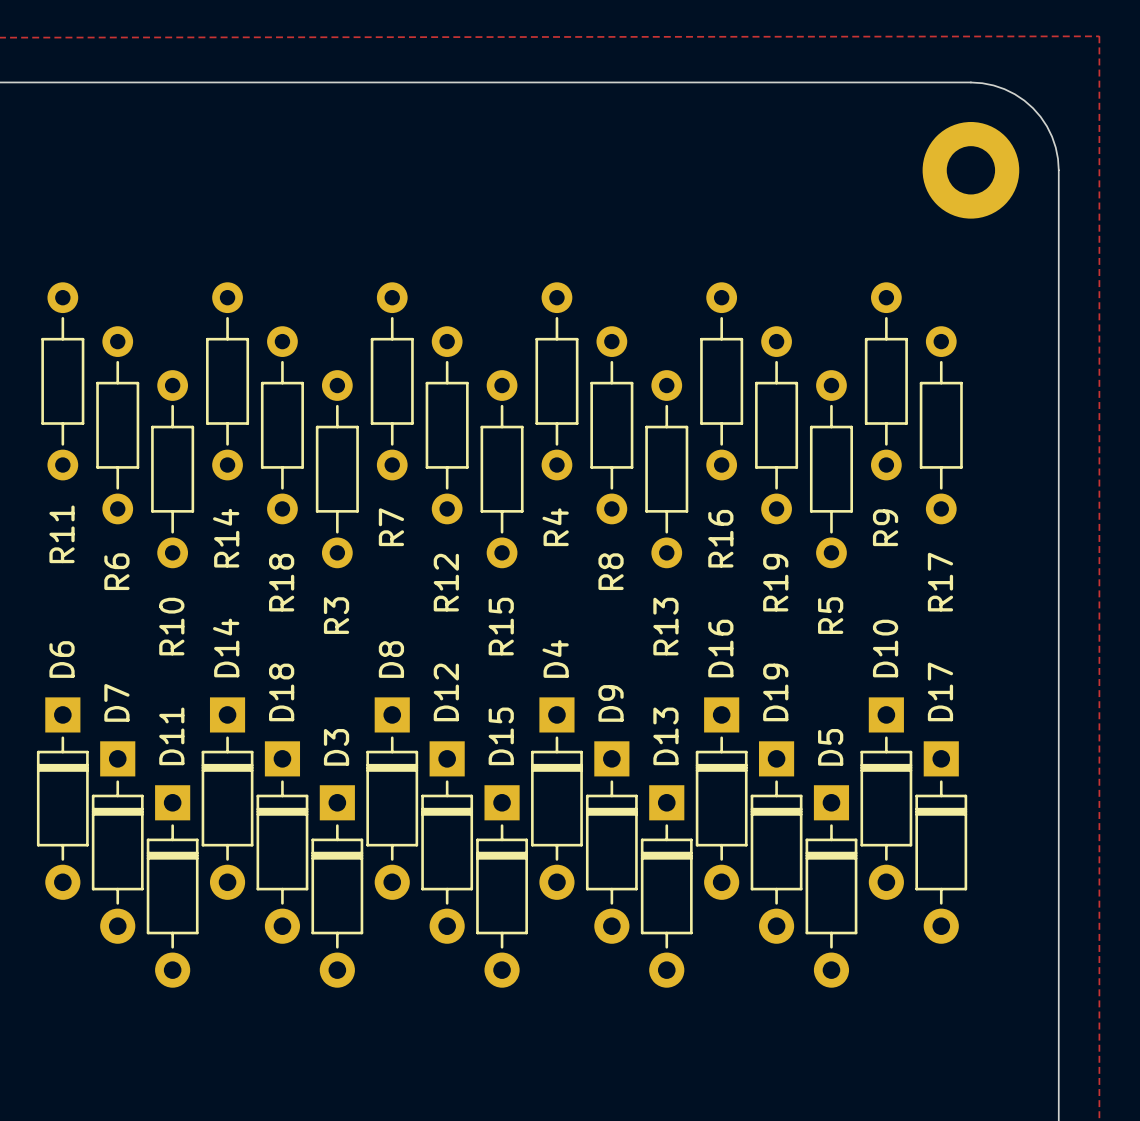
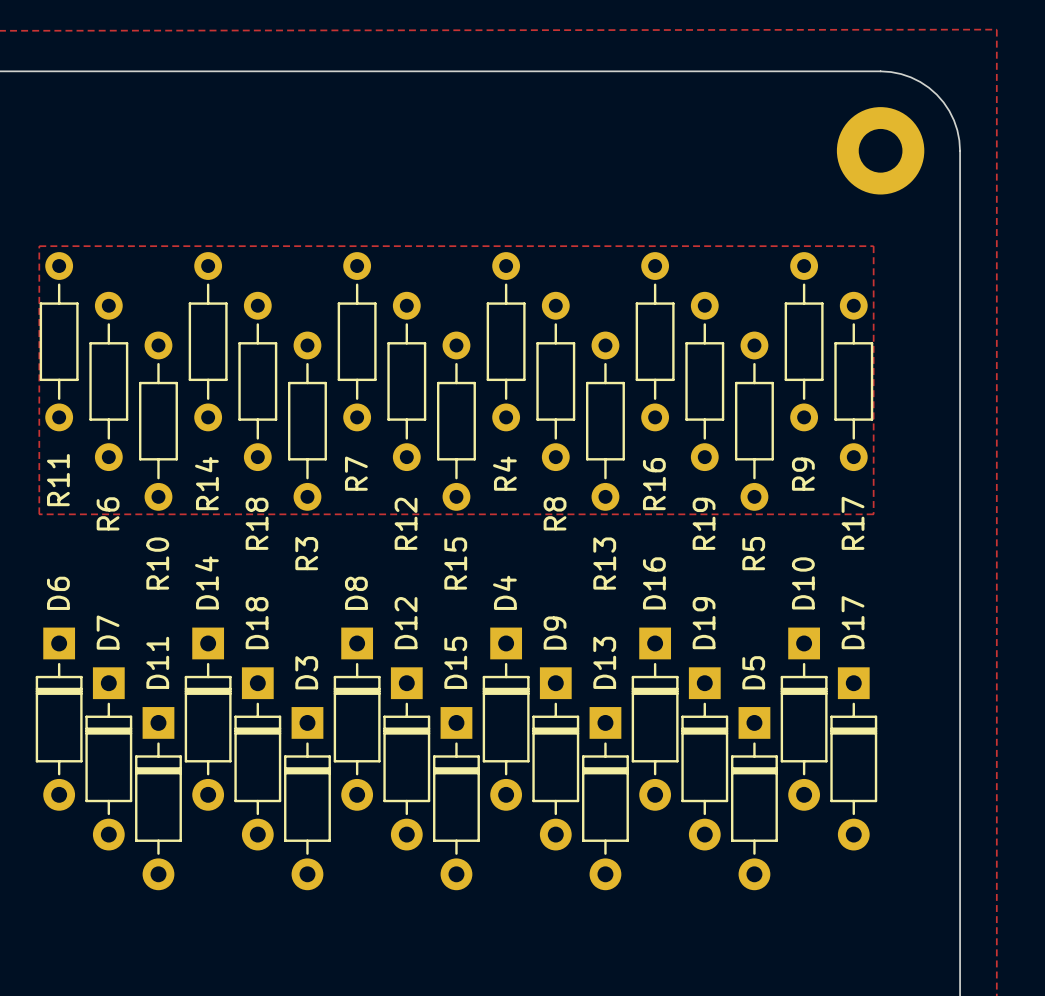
top zone outline: none -> (39, 246) (39, 514) (873, 514) (873, 246) (39, 246)

